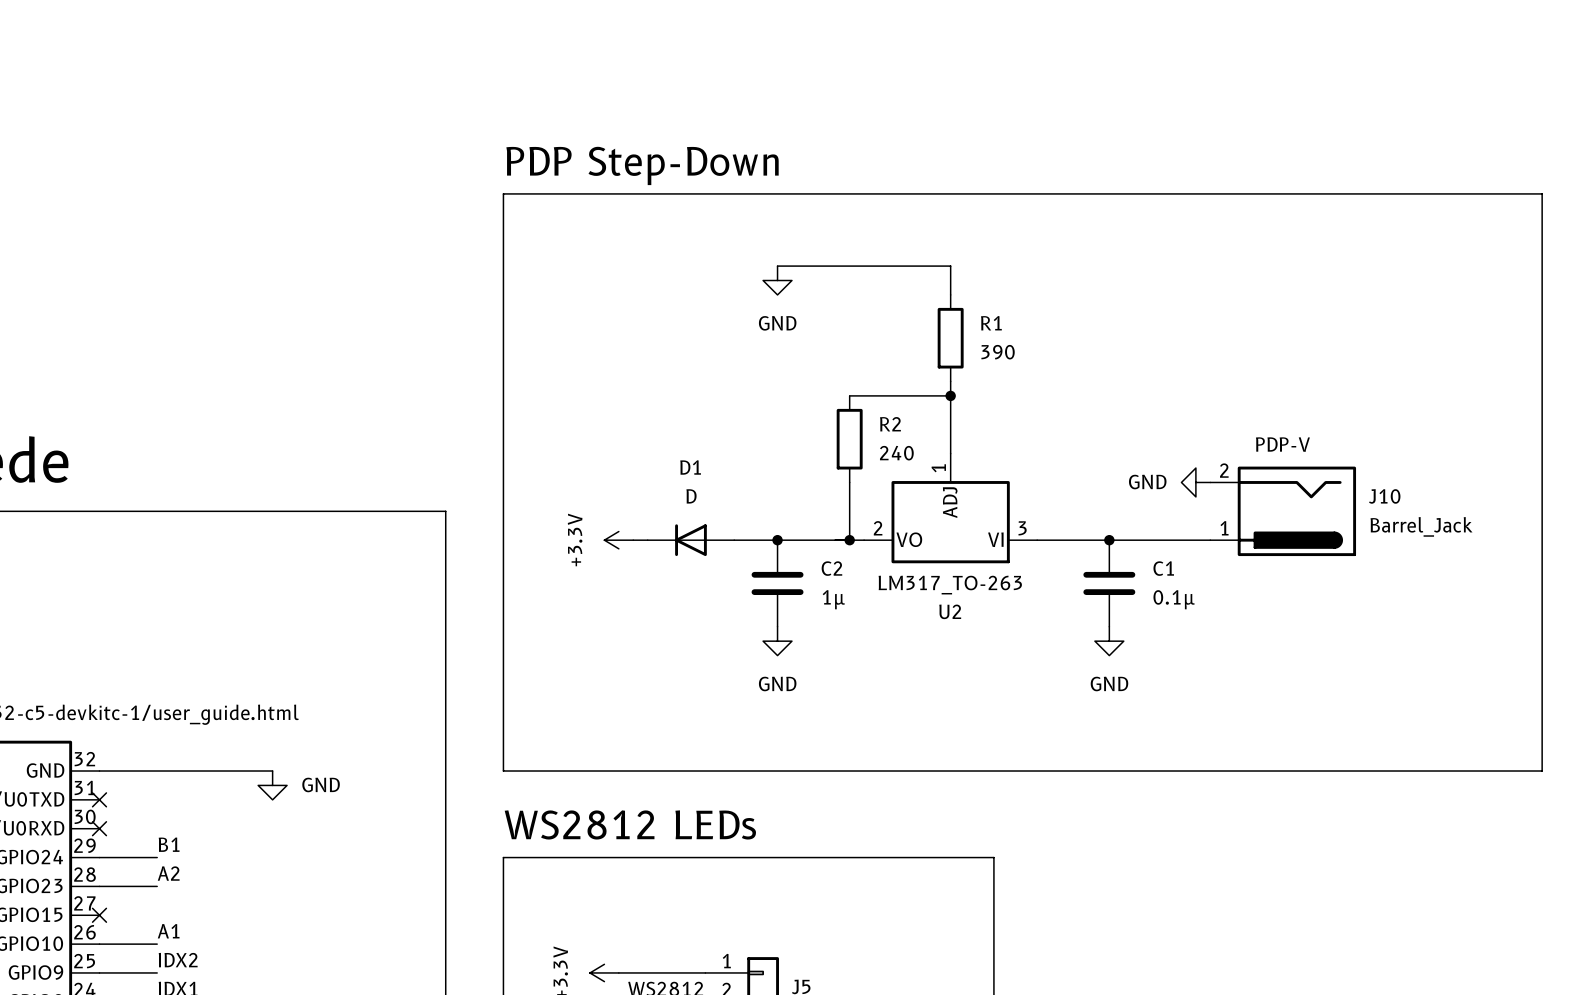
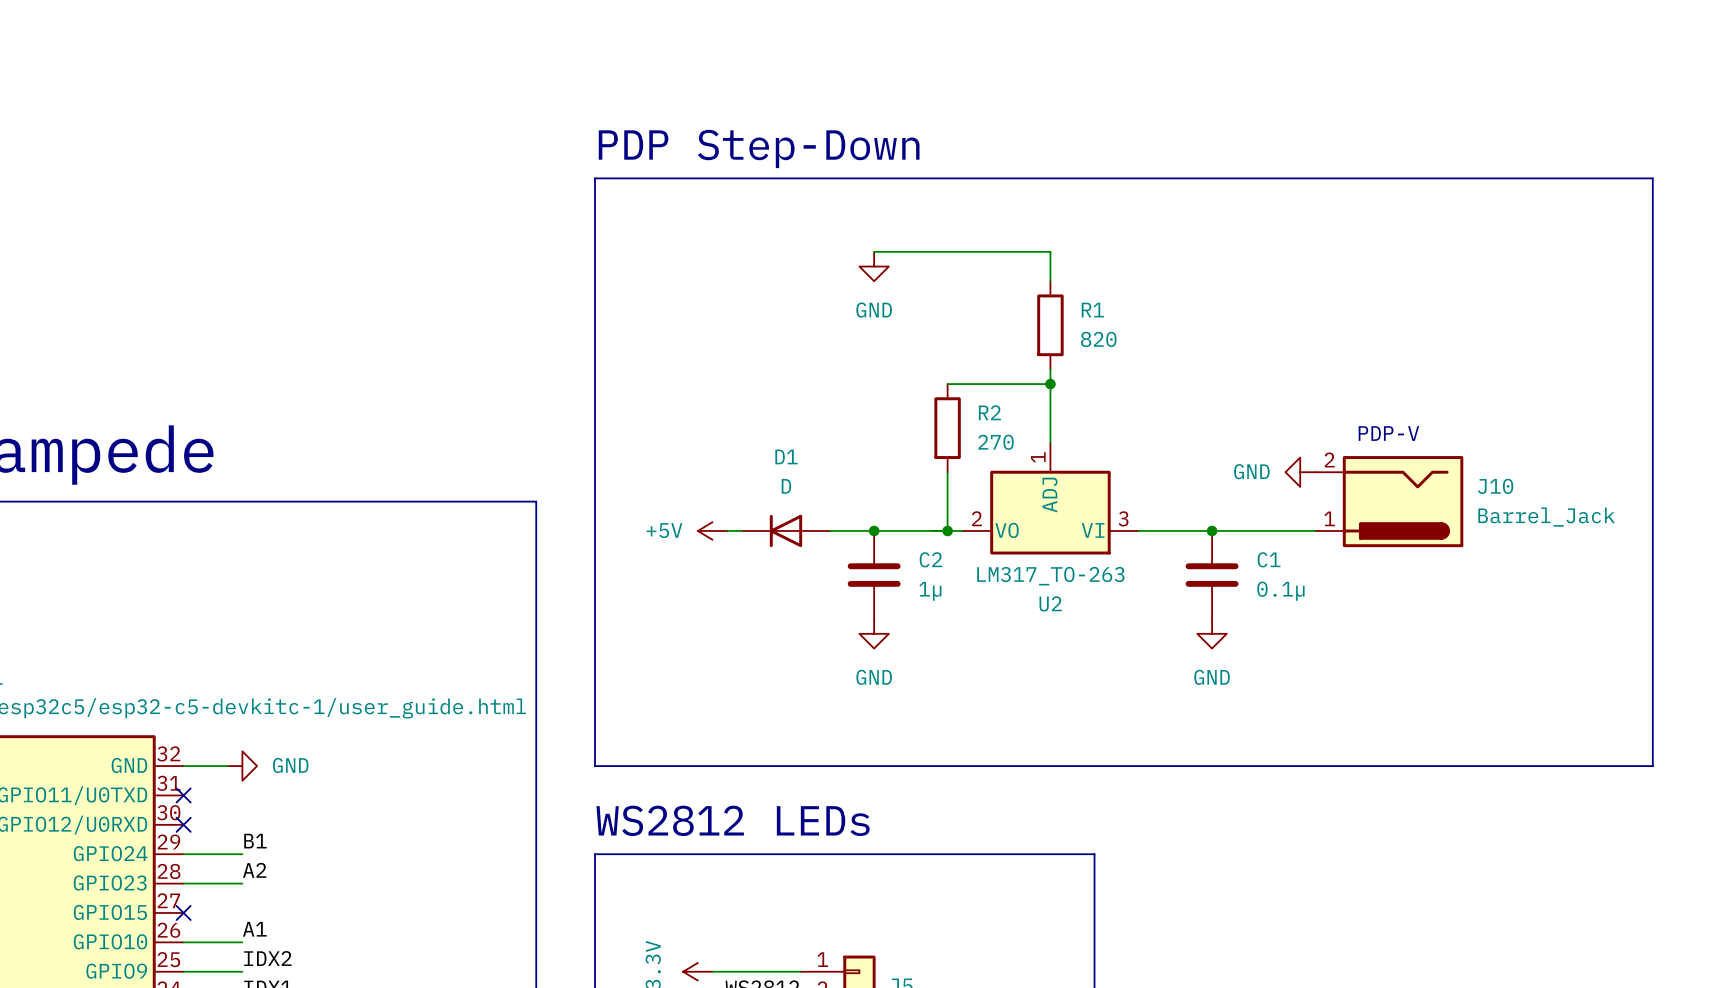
R1 value: 390 (998, 352) -> 820 (1098, 339)
R2 value: 240 (896, 453) -> 270 (996, 442)
power symbol: +3.3V (618, 540) -> +5V (712, 530)
wire: (142, 771) (272, 771) -> none
power symbol rotation: 0° (272, 785) -> 90° counterclockwise (242, 766)
power symbol position: GND (272, 785) -> GND (242, 766)

